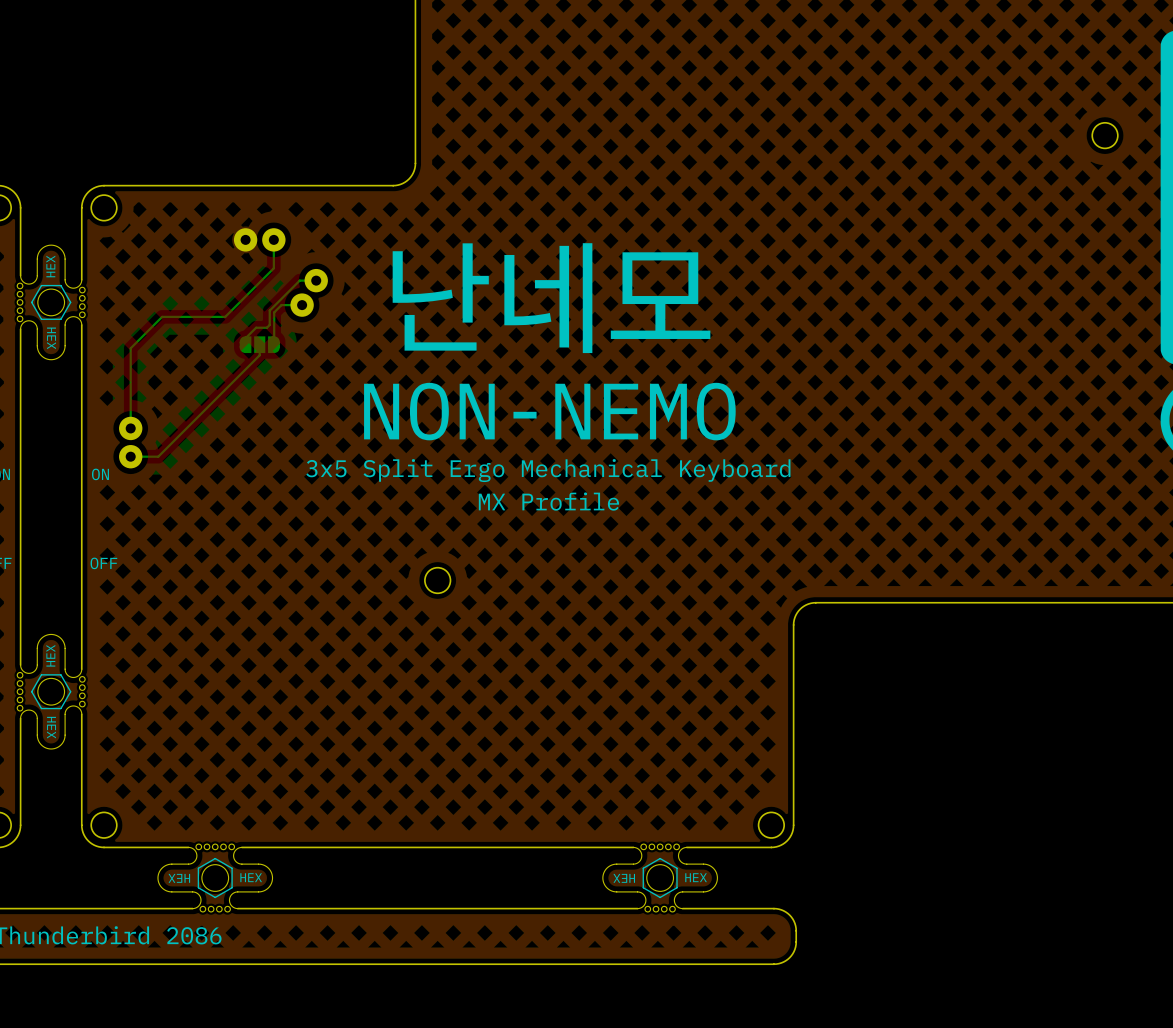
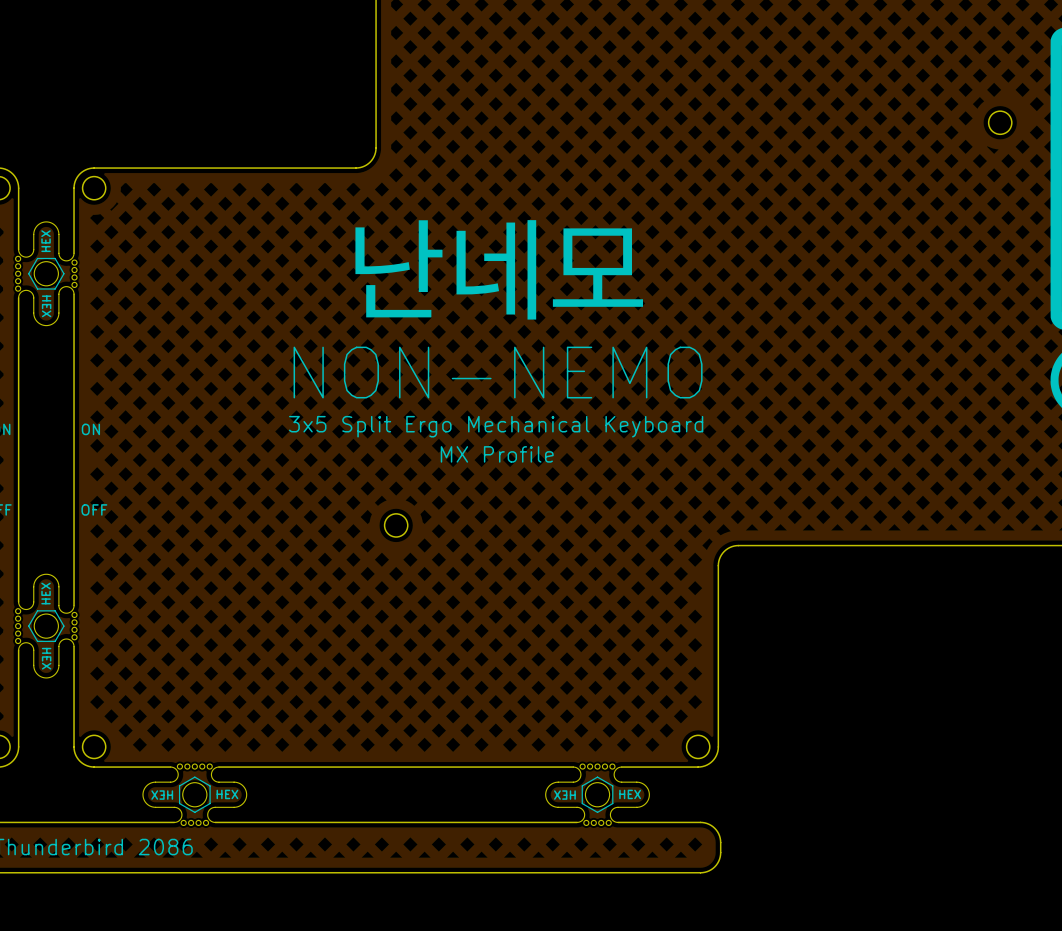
part: (259, 239) -> none
bottom track: (273, 239) (273, 268) (225, 316) (162, 316) (130, 348) (130, 428) -> none
bottom track: (316, 280) (299, 280) (269, 310) (269, 324) (266, 327) (256, 327) (245, 338) (245, 344) -> none
part: (309, 292) -> none
bottom track: (302, 305) (281, 305) (274, 312) (274, 344) -> none
bottom track: (259, 344) (259, 355) (158, 456) (130, 456) -> none
part: (259, 344) -> none
part: (130, 442) -> none

